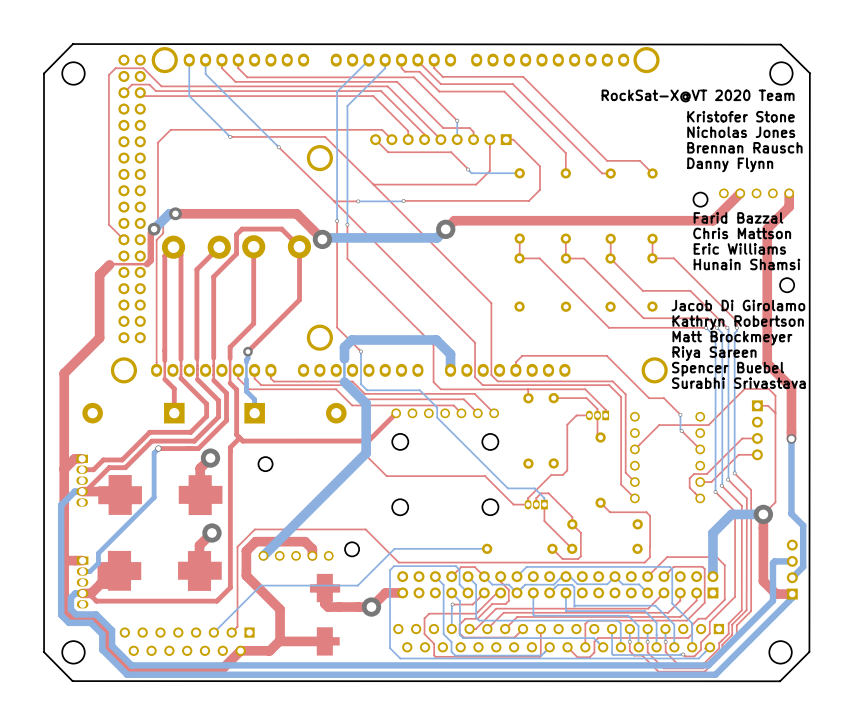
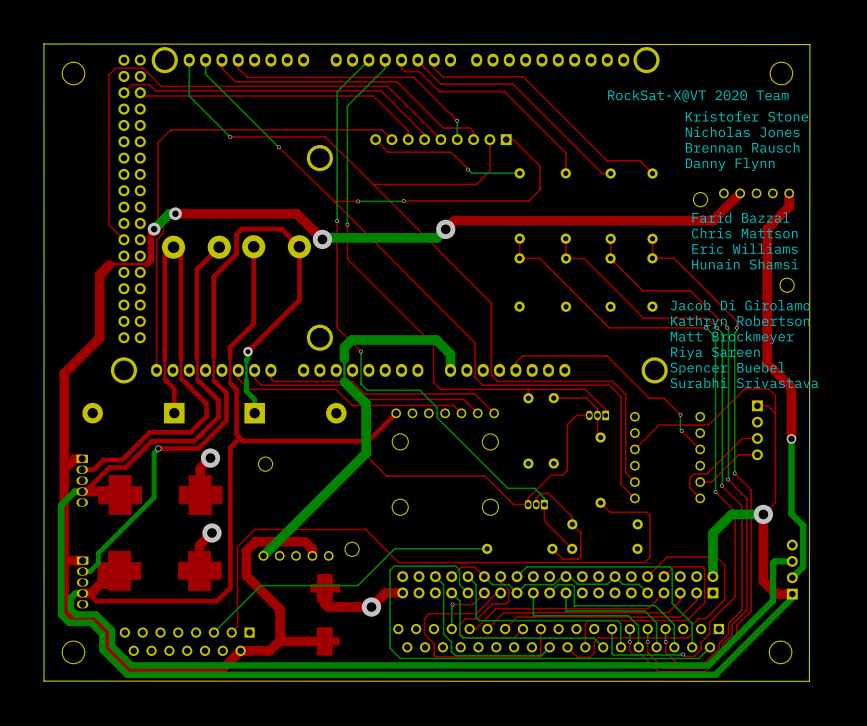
board edge: (72, 44) (43, 73) (44, 652) (72, 681) (780, 681) (809, 651) (809, 73) (780, 44) -> (72, 44) (43, 44) (44, 681) (809, 681) (809, 44) (780, 44)

